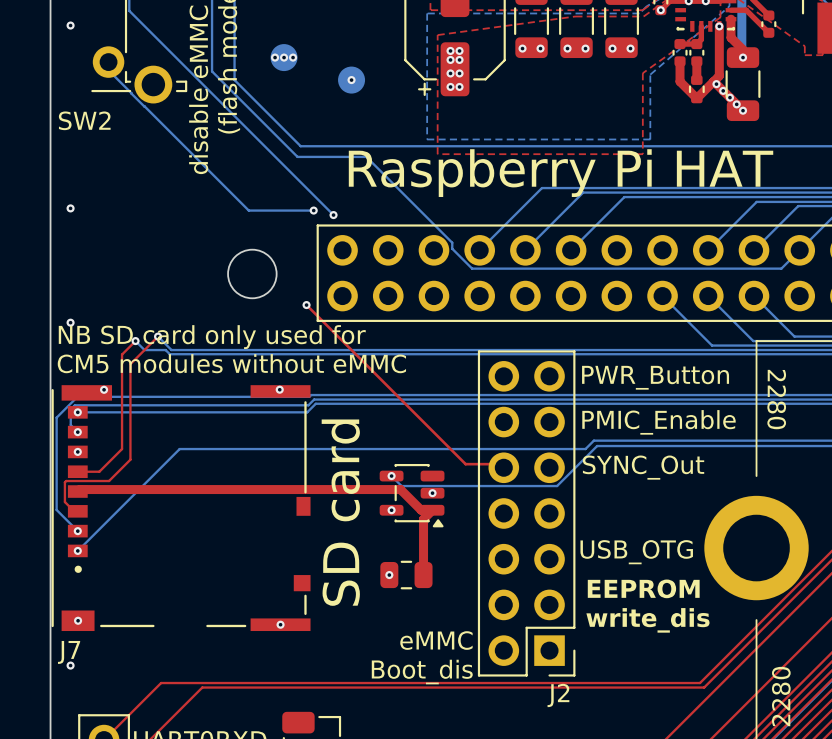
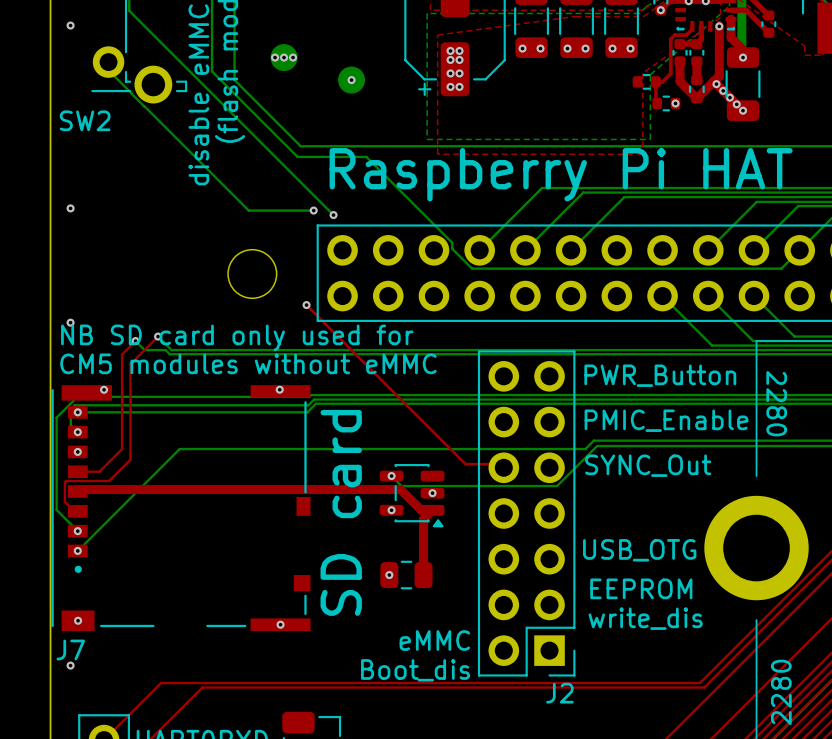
top track: none -> (692, 26) (692, 29) (686, 35) (674, 35) (670, 38) (670, 73) (662, 81) (655, 81) (657, 103)
part: none -> (646, 81)
part: none -> (666, 103)
via: none -> (675, 103)

